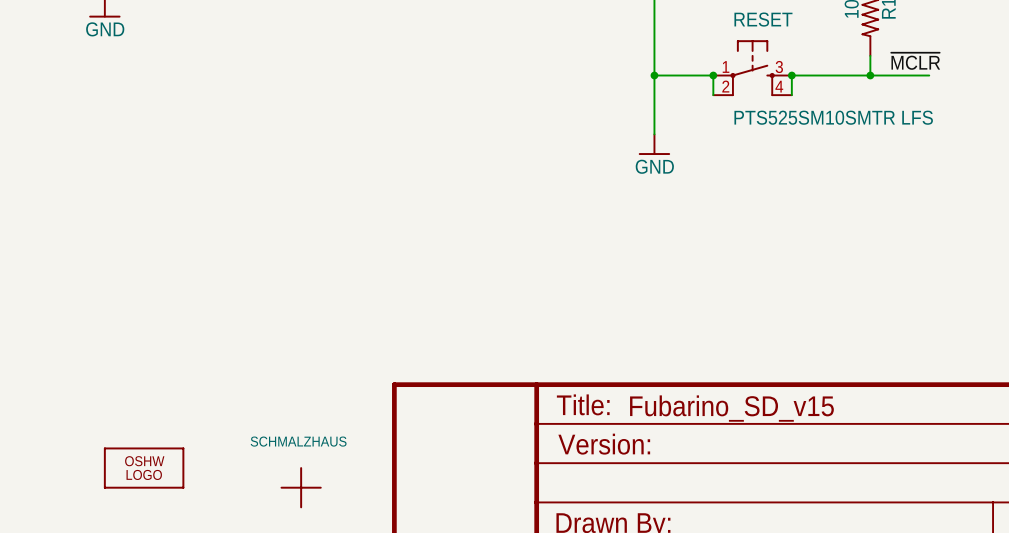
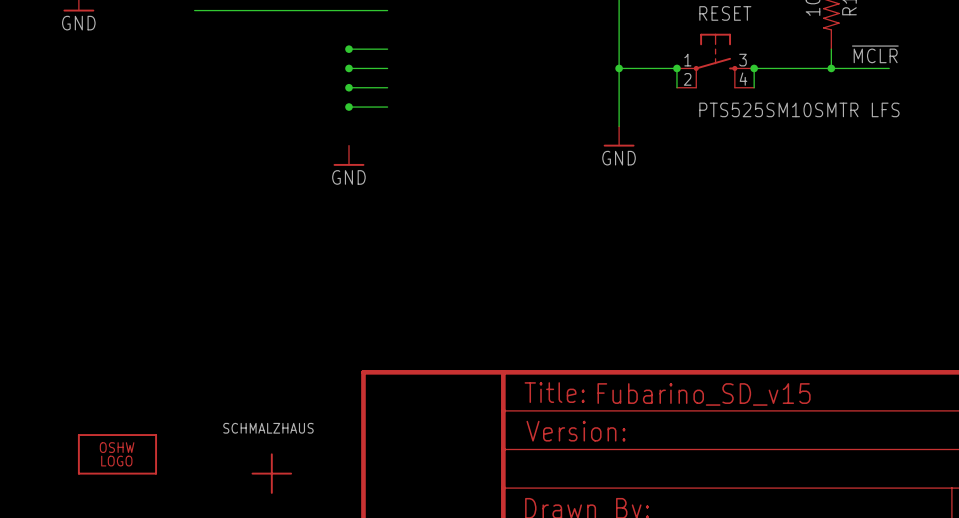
wire: none -> (194, 10) (387, 10)
wire: none -> (348, 49) (387, 49)
junction: none -> (348, 49)
wire: none -> (348, 68) (387, 68)
junction: none -> (348, 68)
wire: none -> (348, 87) (387, 87)
junction: none -> (348, 87)
wire: none -> (348, 107) (387, 107)
junction: none -> (348, 107)
power symbol: none -> GND (348, 155)

